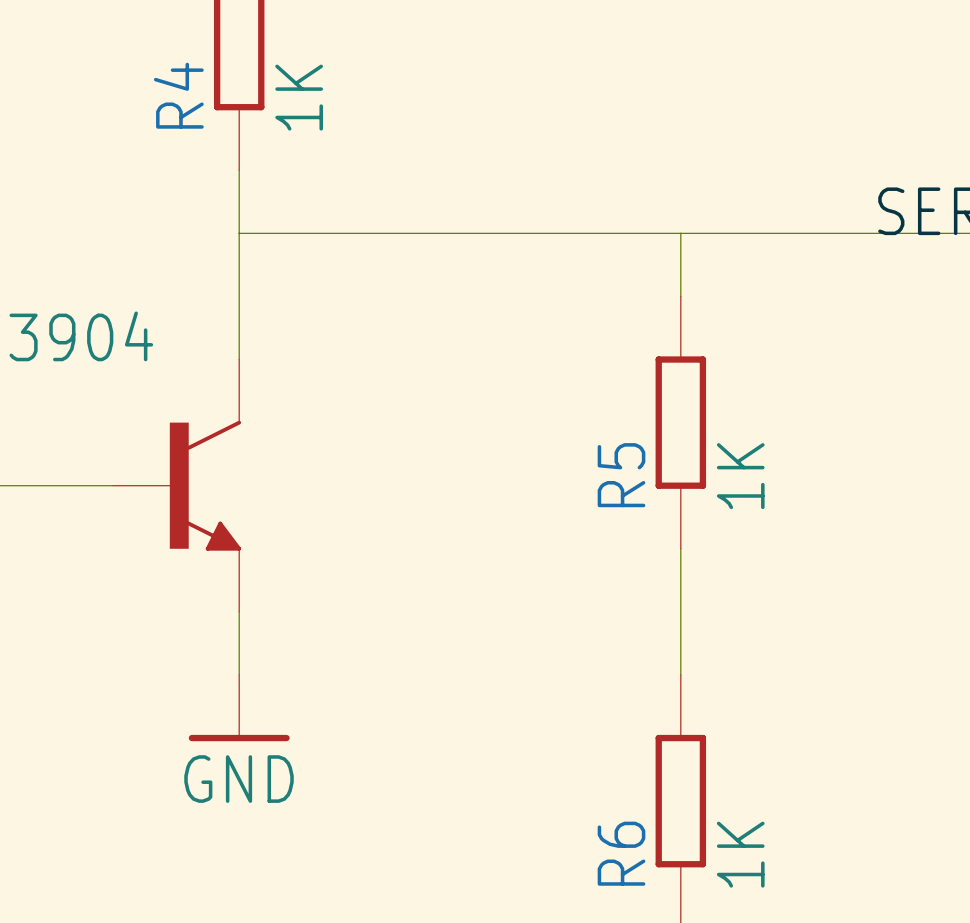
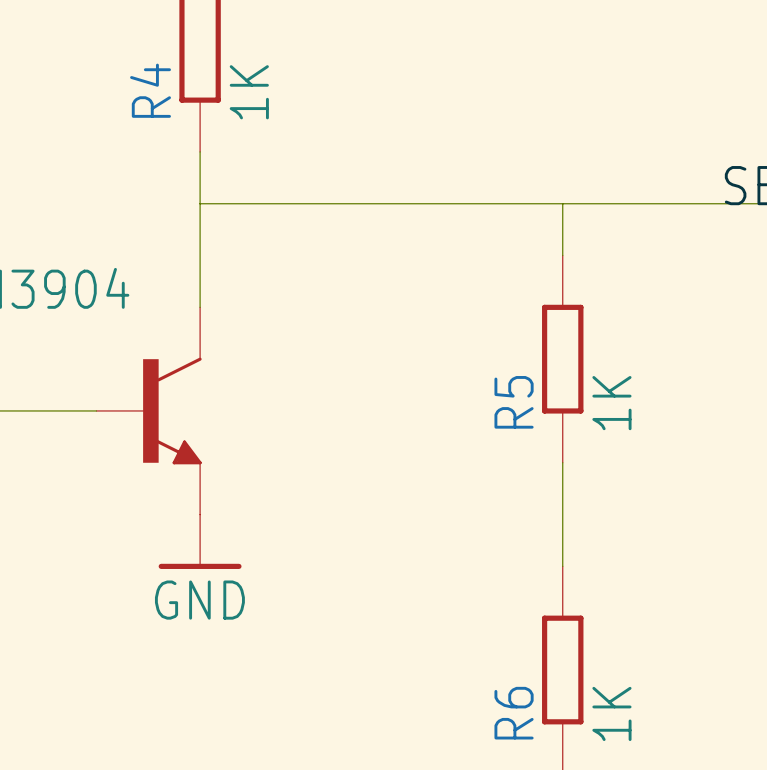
power symbol position: GND (239, 708) -> GND (200, 541)

